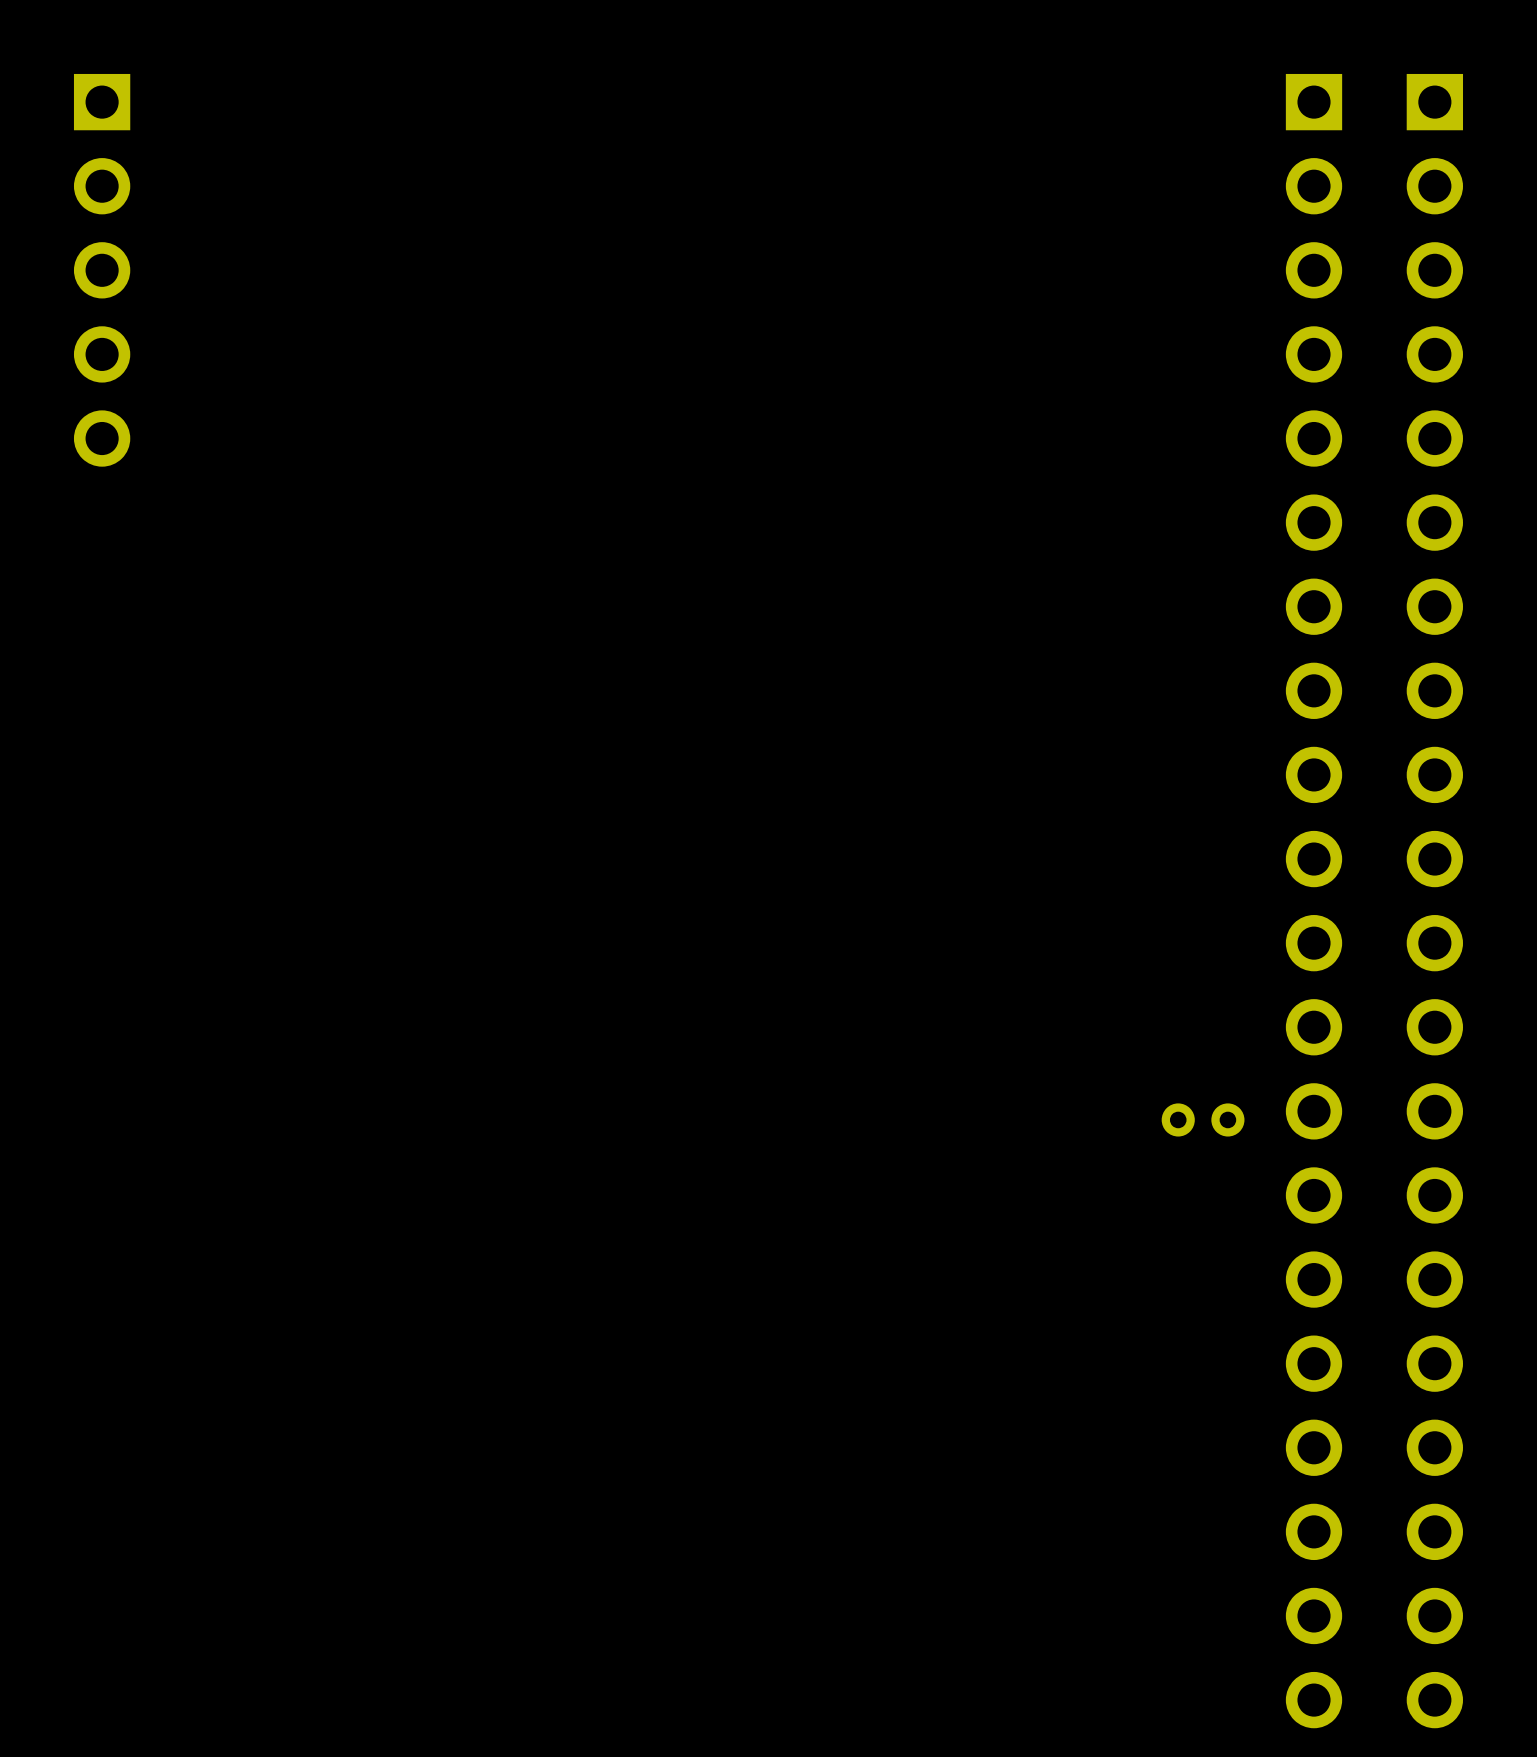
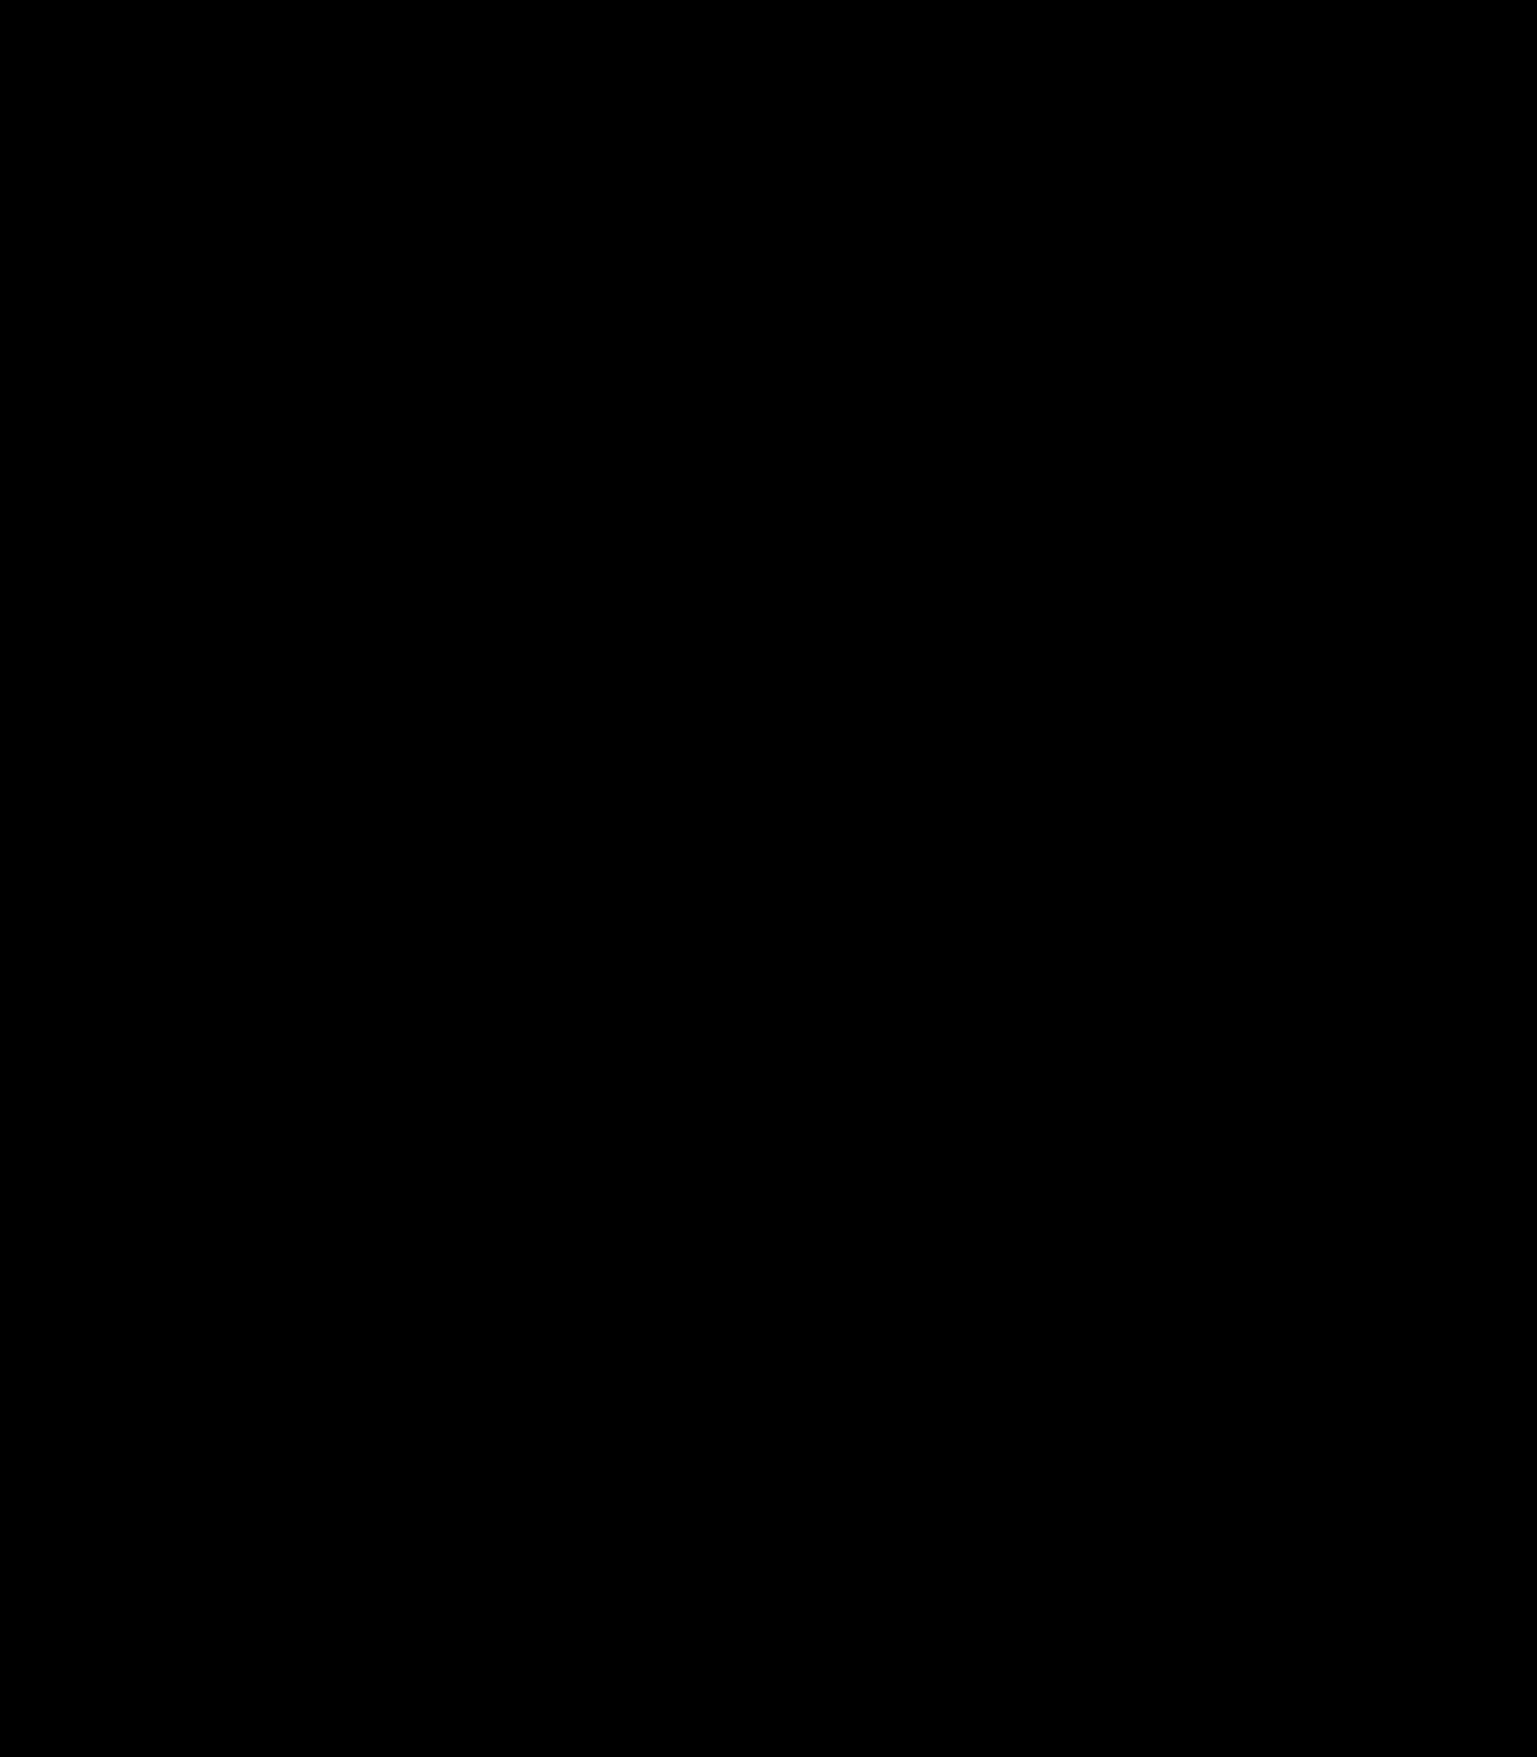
part: (102, 270) -> none
part: (1314, 901) -> none
part: (1434, 901) -> none
part: (1203, 1119) -> none

